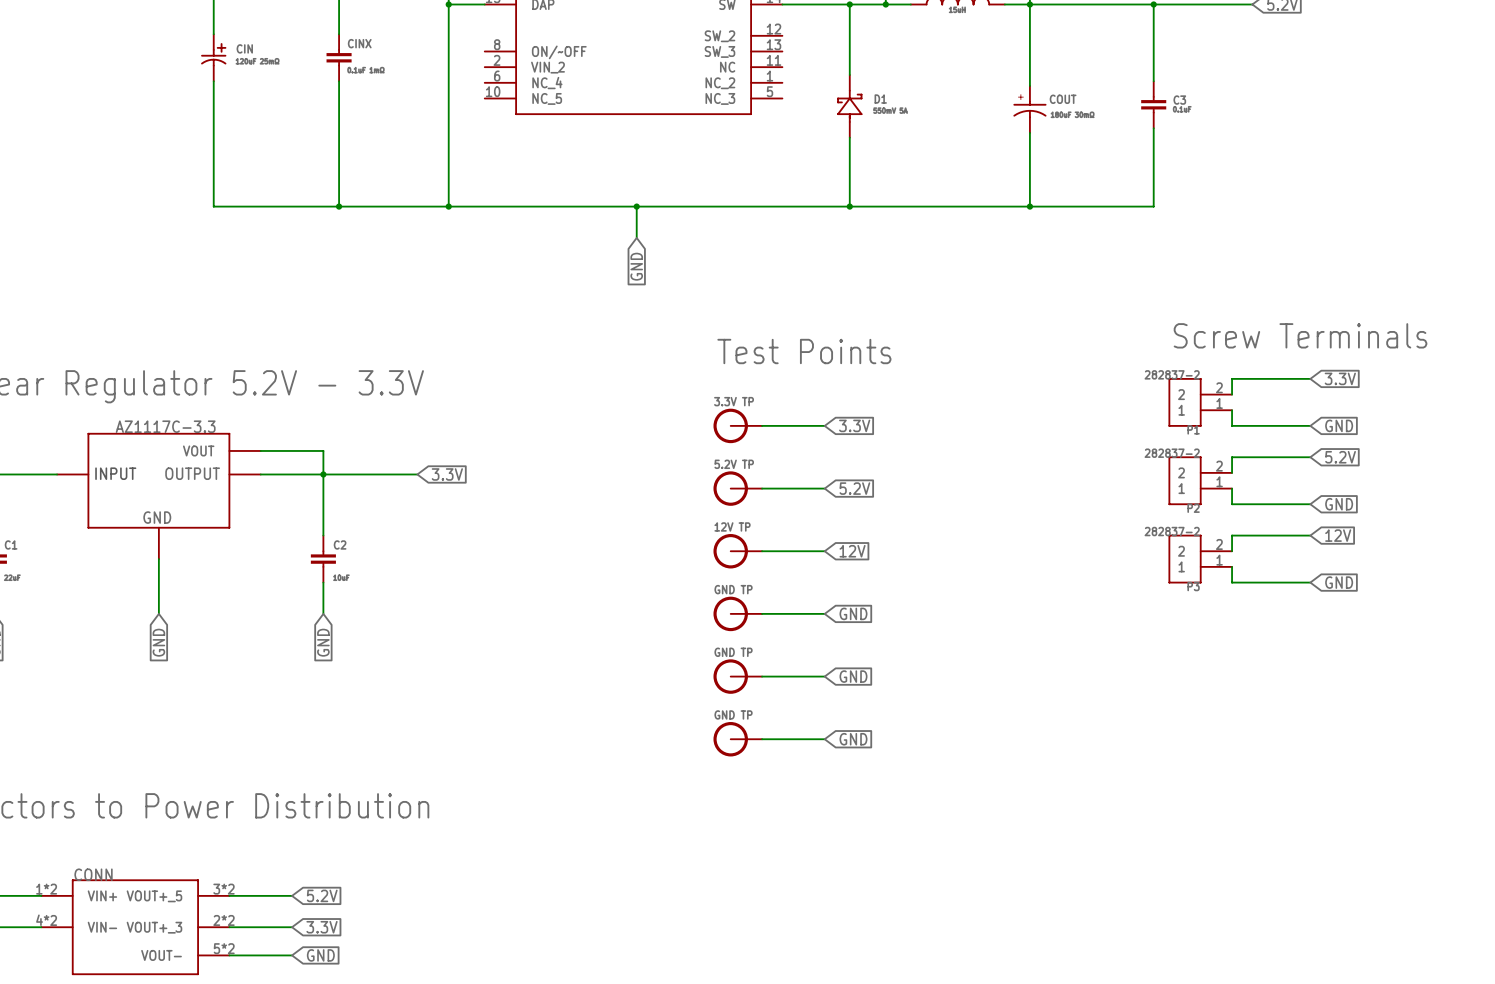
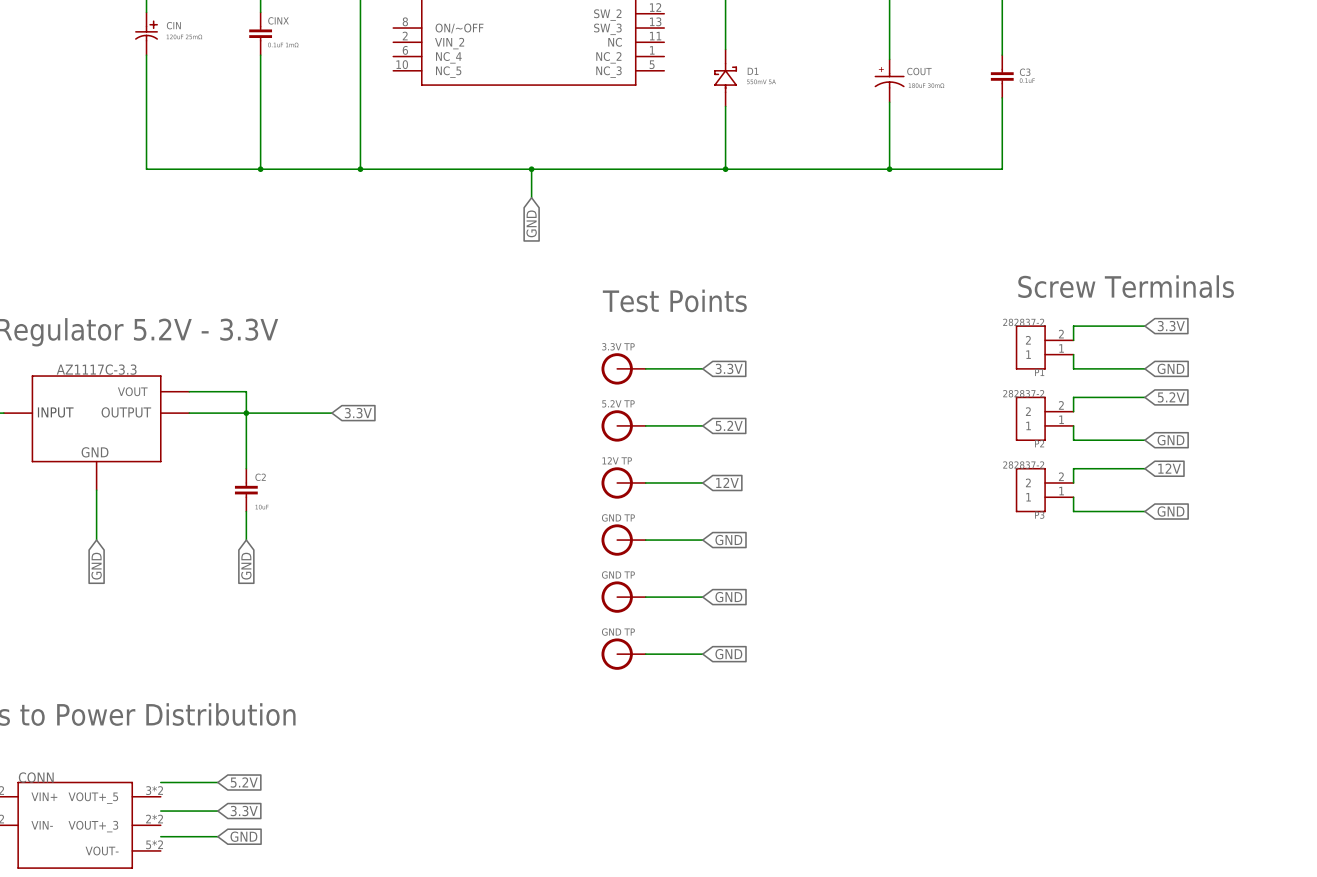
wire: (229, 895) (292, 895) -> (160, 782) (217, 782)
global label position: 5.2V (322, 895) -> 5.2V (244, 782)
wire: (229, 927) (292, 927) -> (160, 811) (217, 811)
global label position: 3.3V (322, 927) -> 3.3V (244, 811)
wire: (229, 955) (292, 955) -> (160, 836) (217, 836)
global label position: GND (320, 955) -> GND (243, 836)

